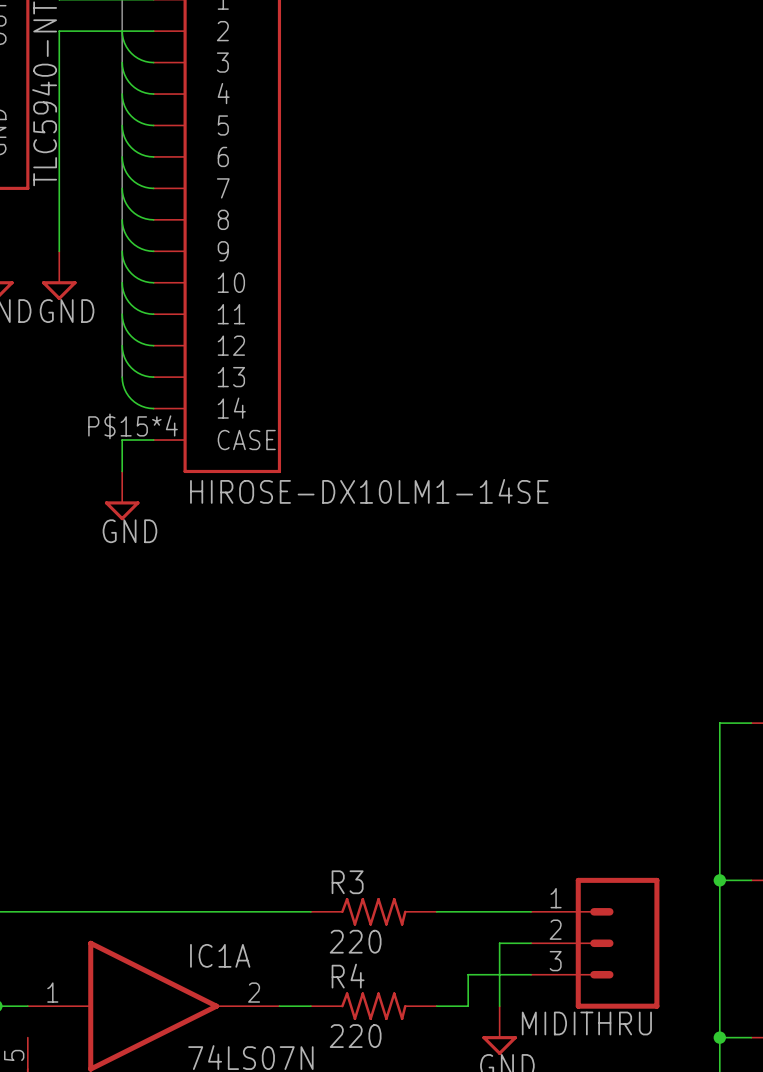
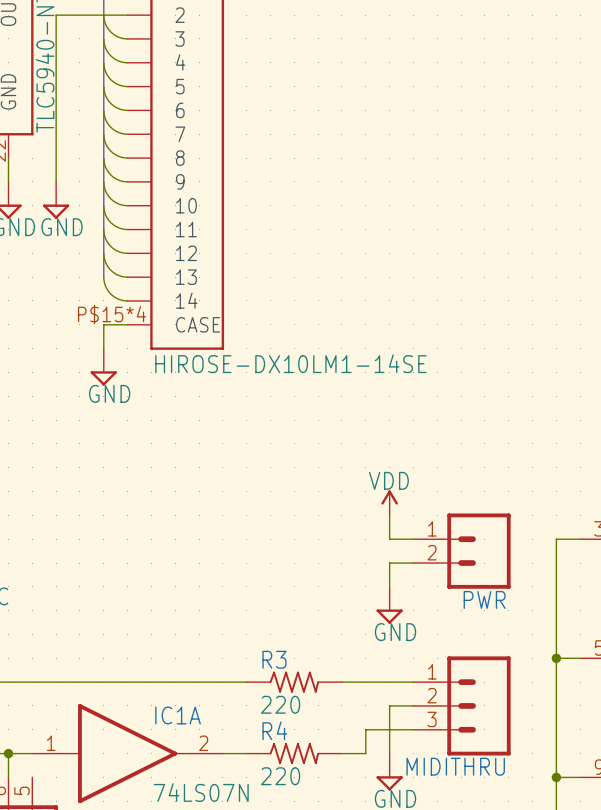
power symbol: none -> VDD (389, 502)
wire: none -> (389, 515) (389, 539) (413, 539)
PWR: none -> (462, 551)
wire: none -> (413, 563) (389, 563) (389, 586)
power symbol: none -> GND (389, 605)

